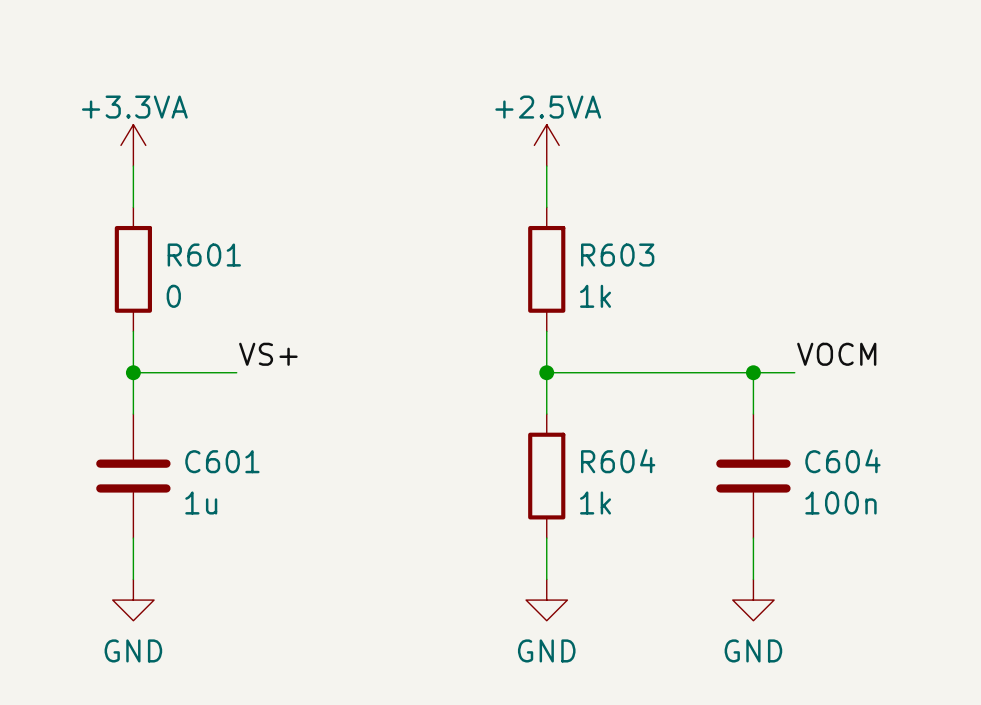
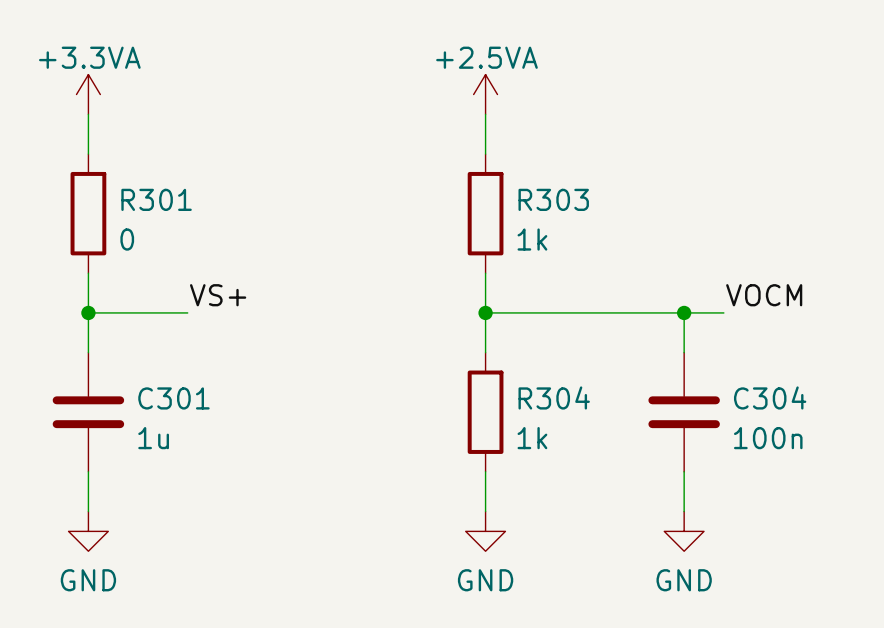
R601 name: R601 (204, 255) -> R301 (156, 199)
R603 name: R603 (617, 255) -> R303 (553, 199)
C601 name: C601 (222, 461) -> C301 (173, 398)
R604 name: R604 (618, 461) -> R304 (554, 397)
C604 name: C604 (842, 461) -> C304 (770, 397)

